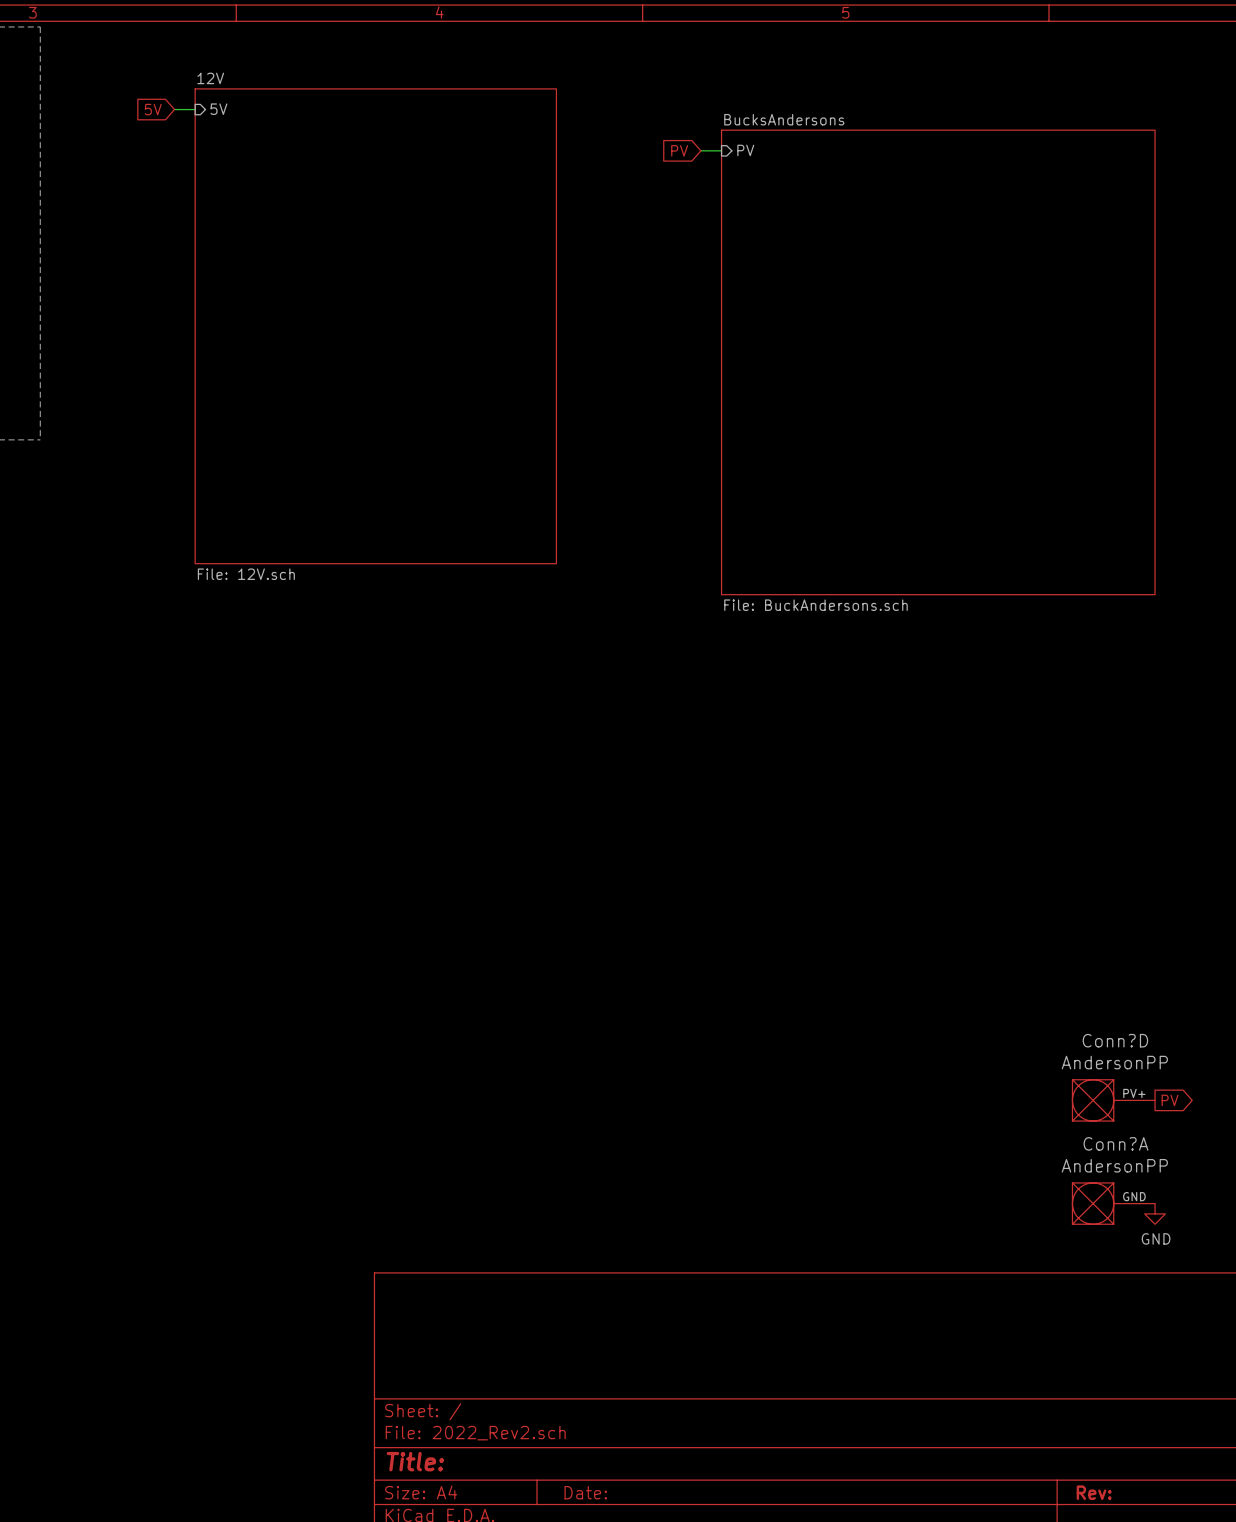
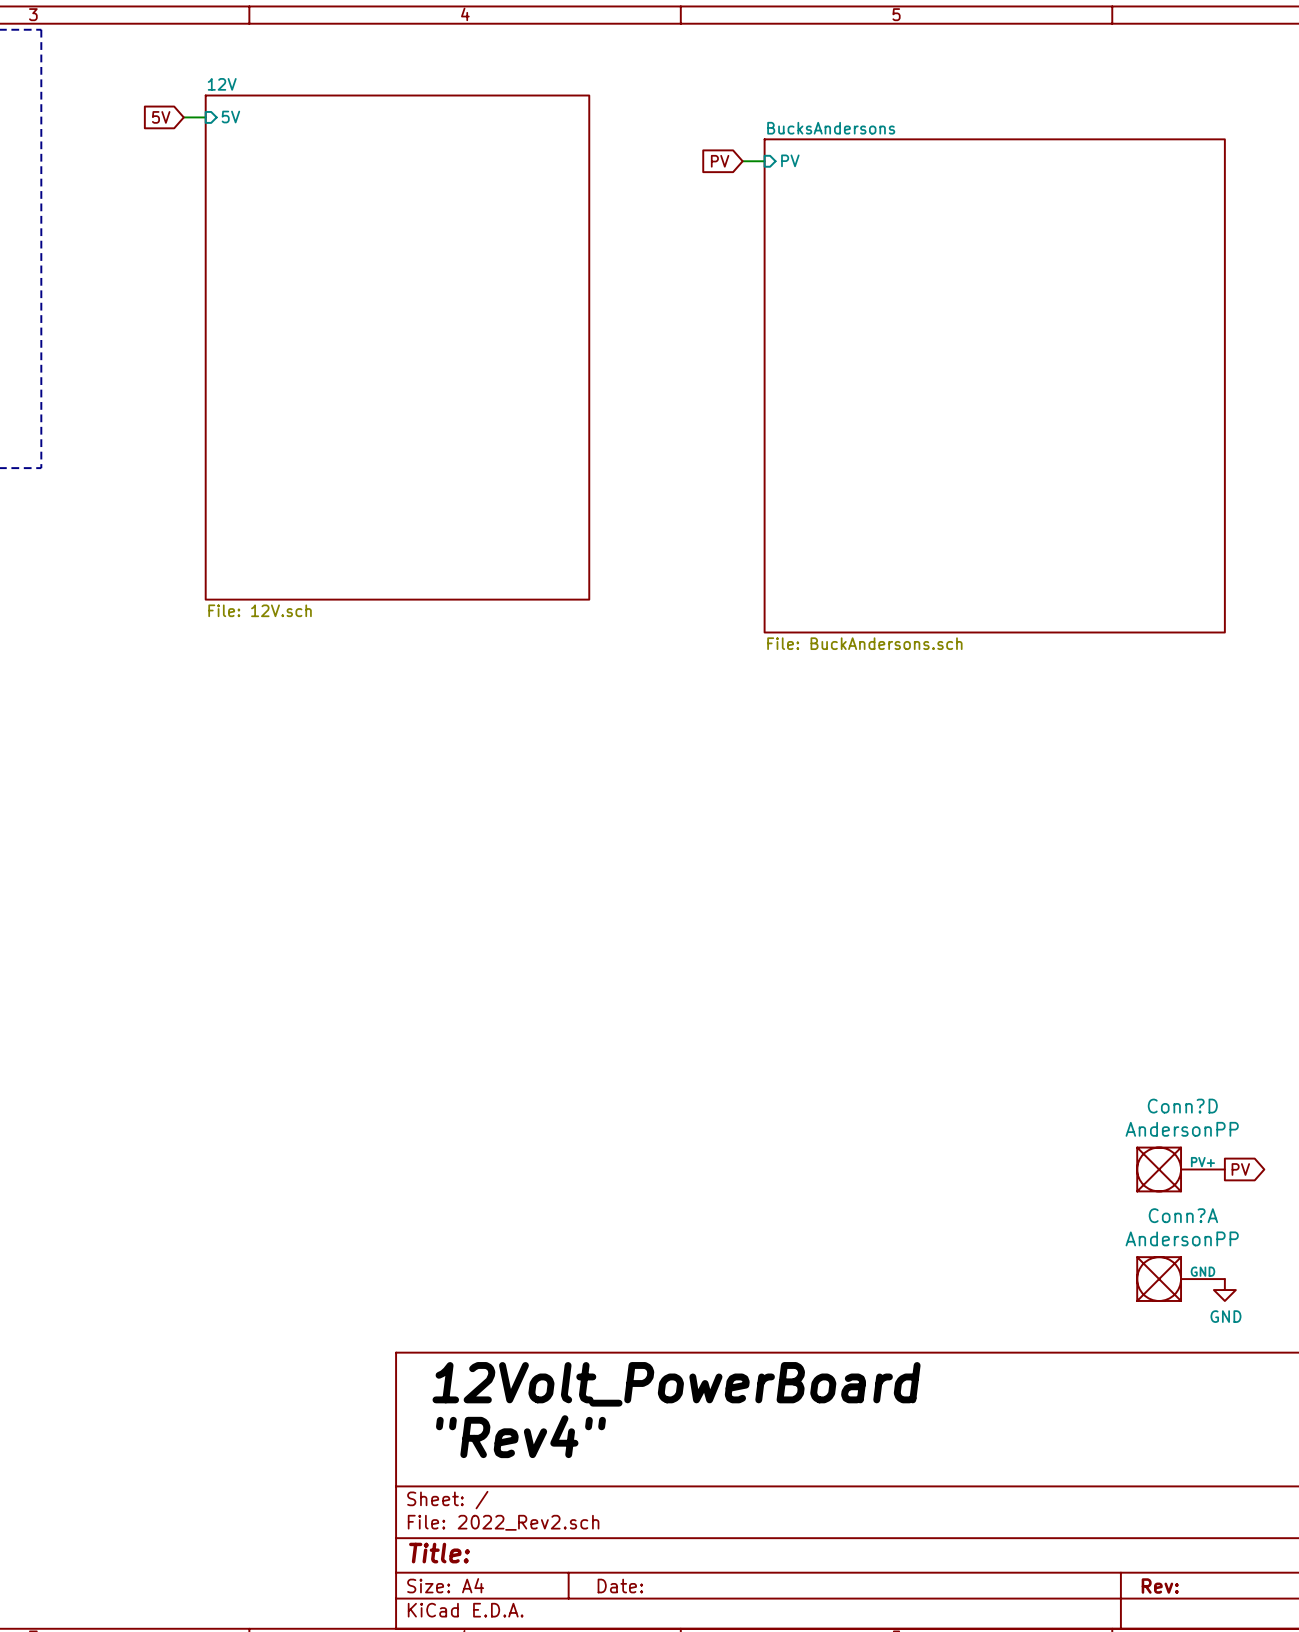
label: none -> 12Volt_PowerBoard (676, 1384)
label: none -> "Rev4" (520, 1436)

